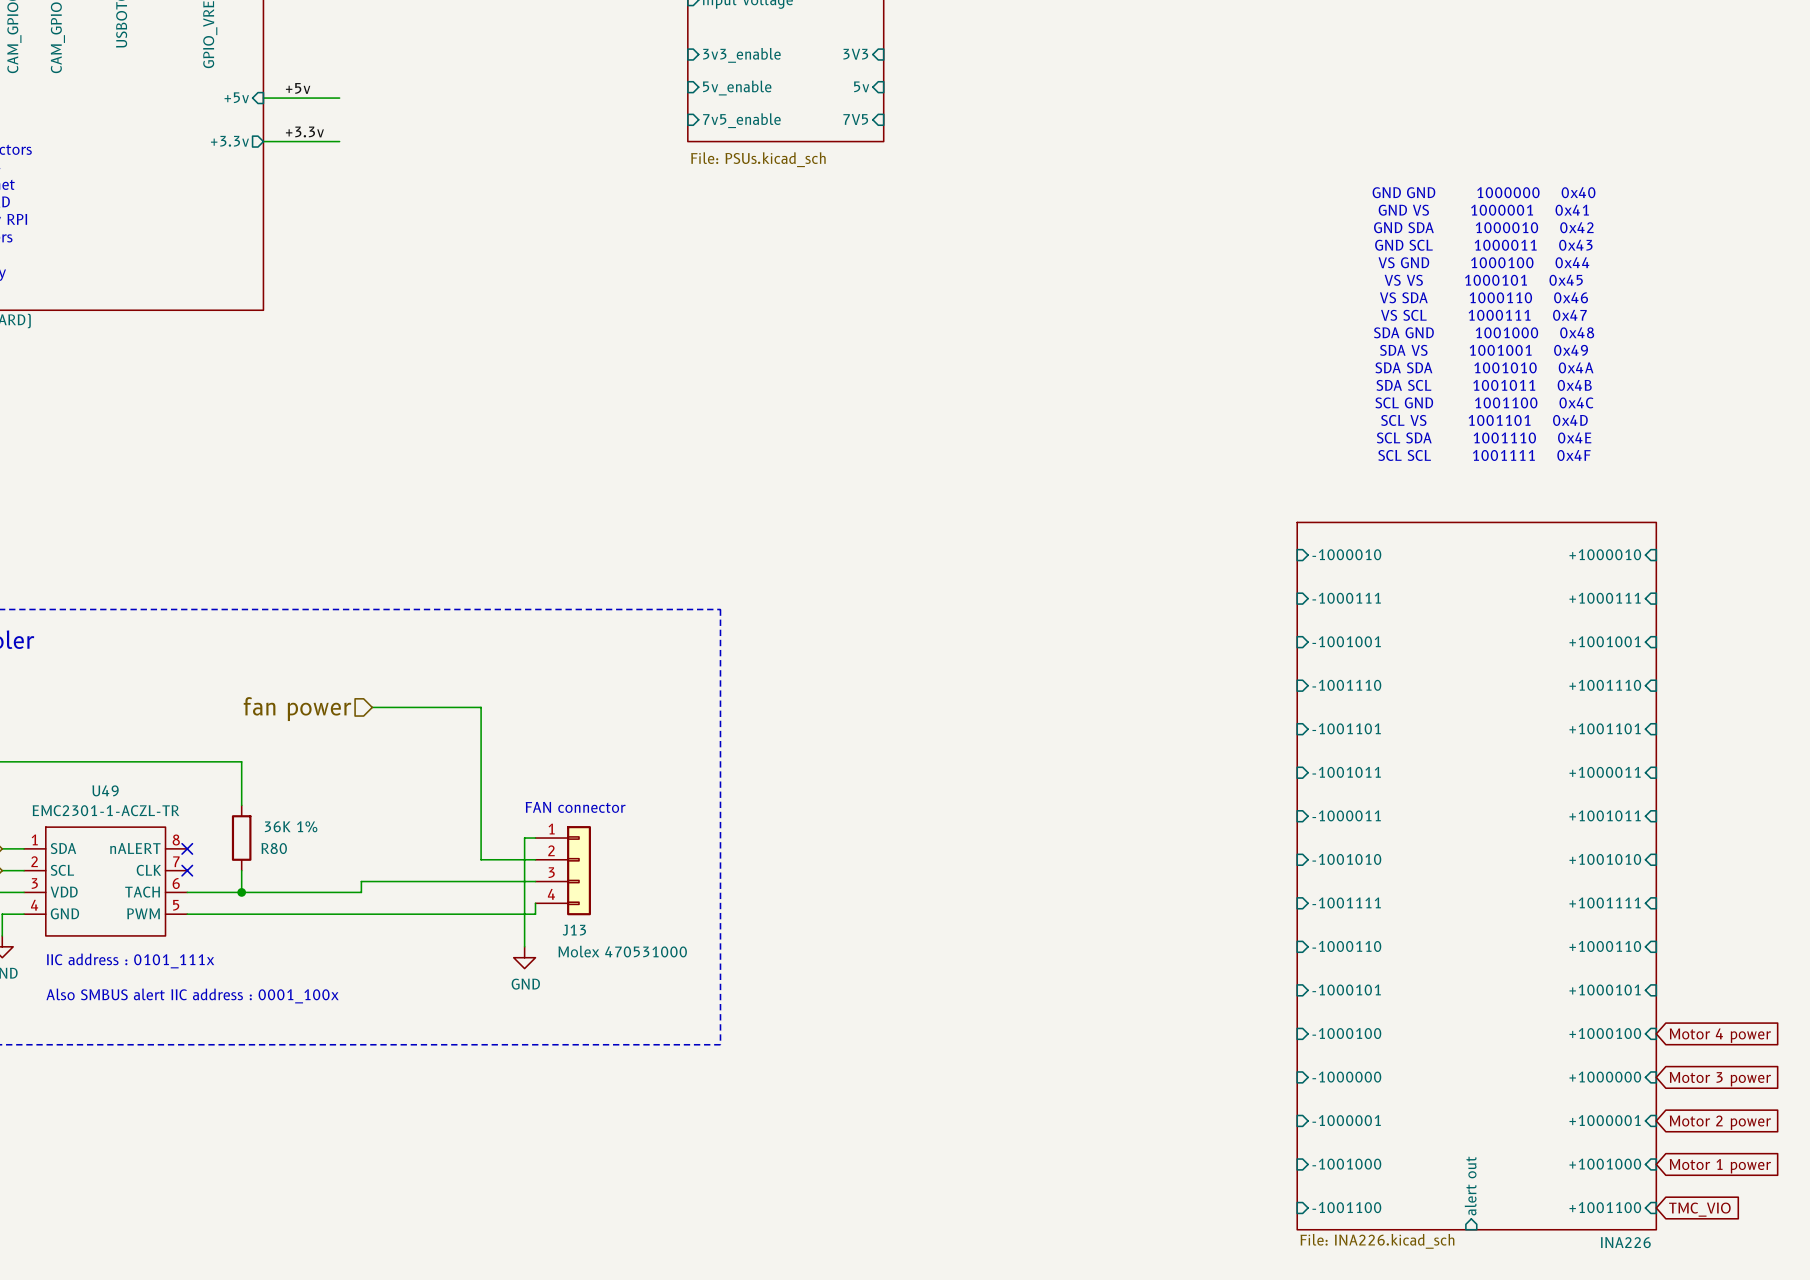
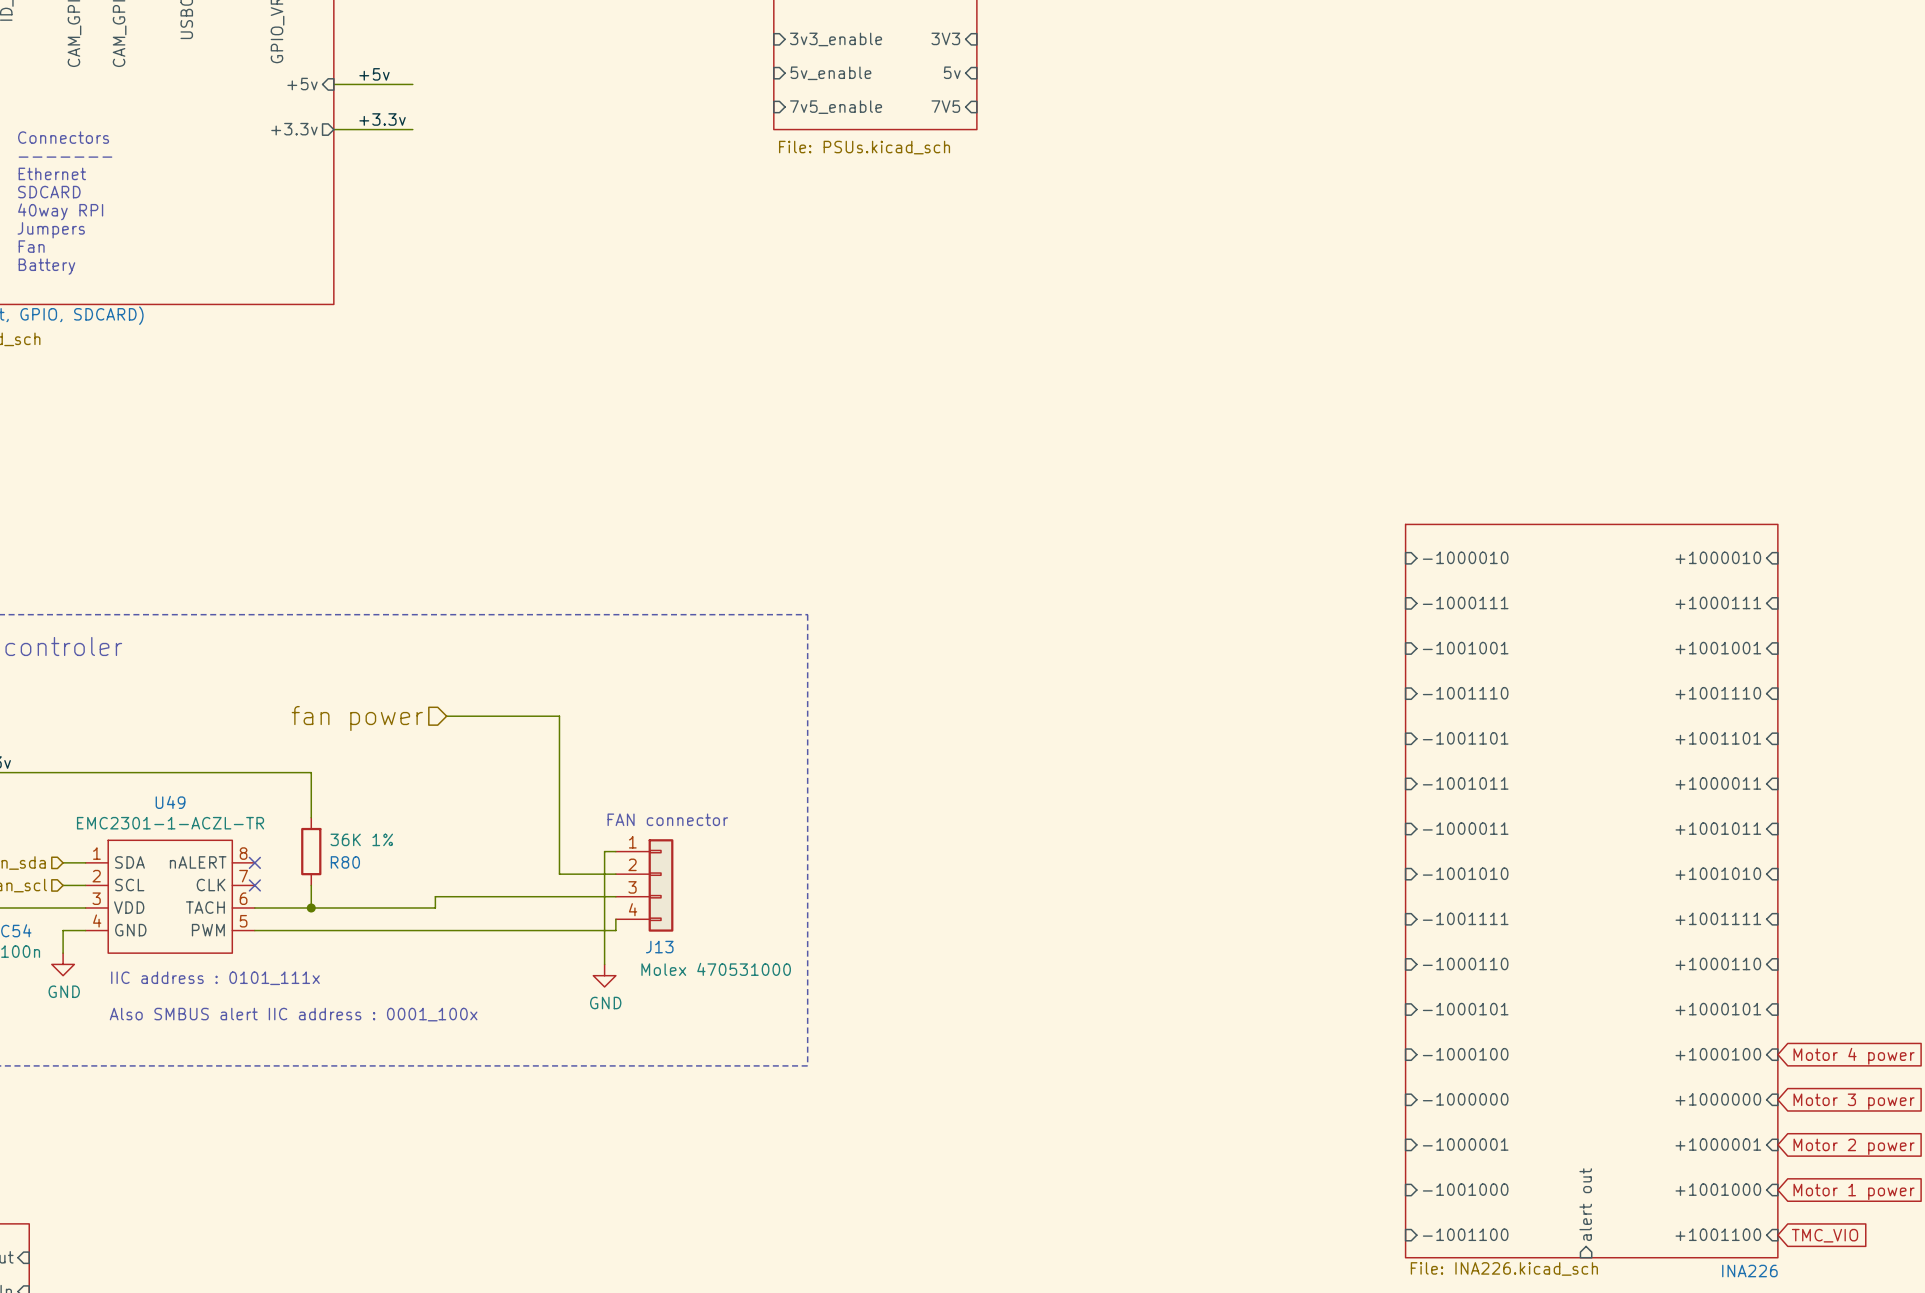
text: GND GND 1000000 0x40 (1484, 192) -> none
text: GND VS 1000001 0x41 (1483, 210) -> none
text: GND SDA 1000010 0x42 (1483, 227) -> none
text: GND SCL 1000011 0x43 (1483, 245) -> none
text: VS GND 1000100 0x44 (1483, 262) -> none
text: VS VS 1000101 0x45 (1483, 280) -> none
text: VS SDA 1000110 0x46 (1484, 297) -> none
text: VS SCL 1000111 0x47 (1483, 315) -> none
text: SDA GND 1001000 0x48 (1484, 332) -> none
text: SDA VS 1001001 0x49 (1484, 350) -> none
text: SDA SDA 1001010 0x4A (1484, 367) -> none
text: SDA SCL 1001011 0x4B (1484, 385) -> none
text: SCL GND 1001100 0x4C (1484, 402) -> none
text: SCL VS 1001101 0x4D (1484, 420) -> none
text: SCL SDA 1001110 0x4E (1484, 437) -> none
text: SCL SCL 1001111 0x4F (1484, 455) -> none

